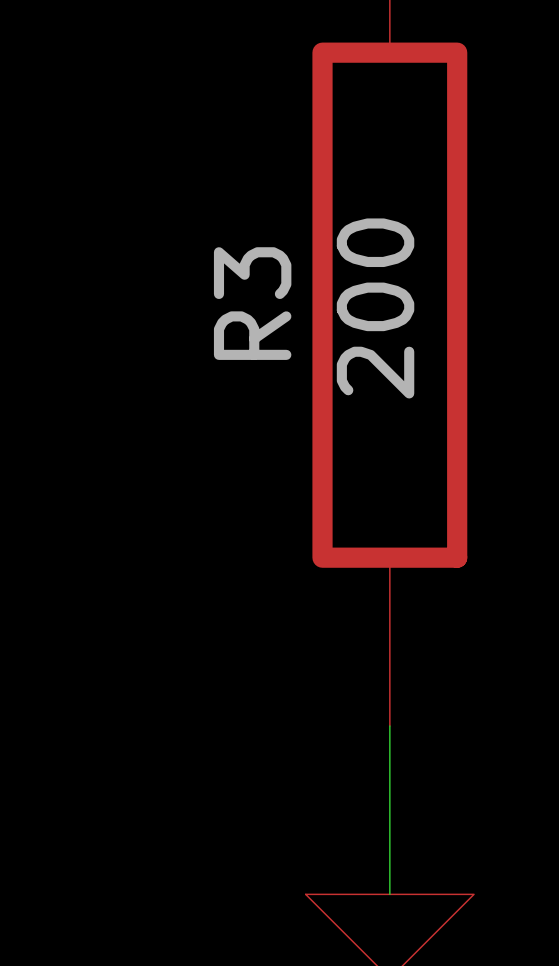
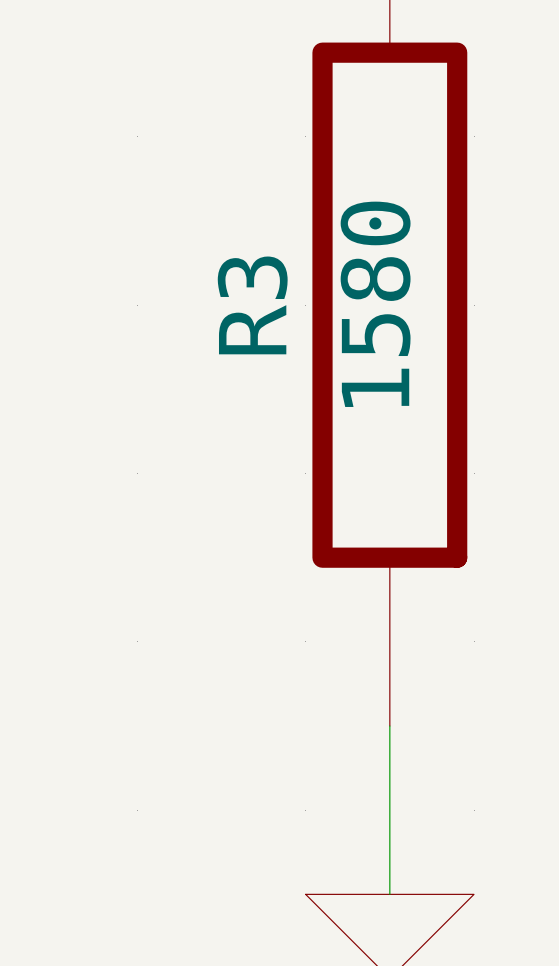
R3 value: 200 (375, 308) -> 1580 (375, 304)

